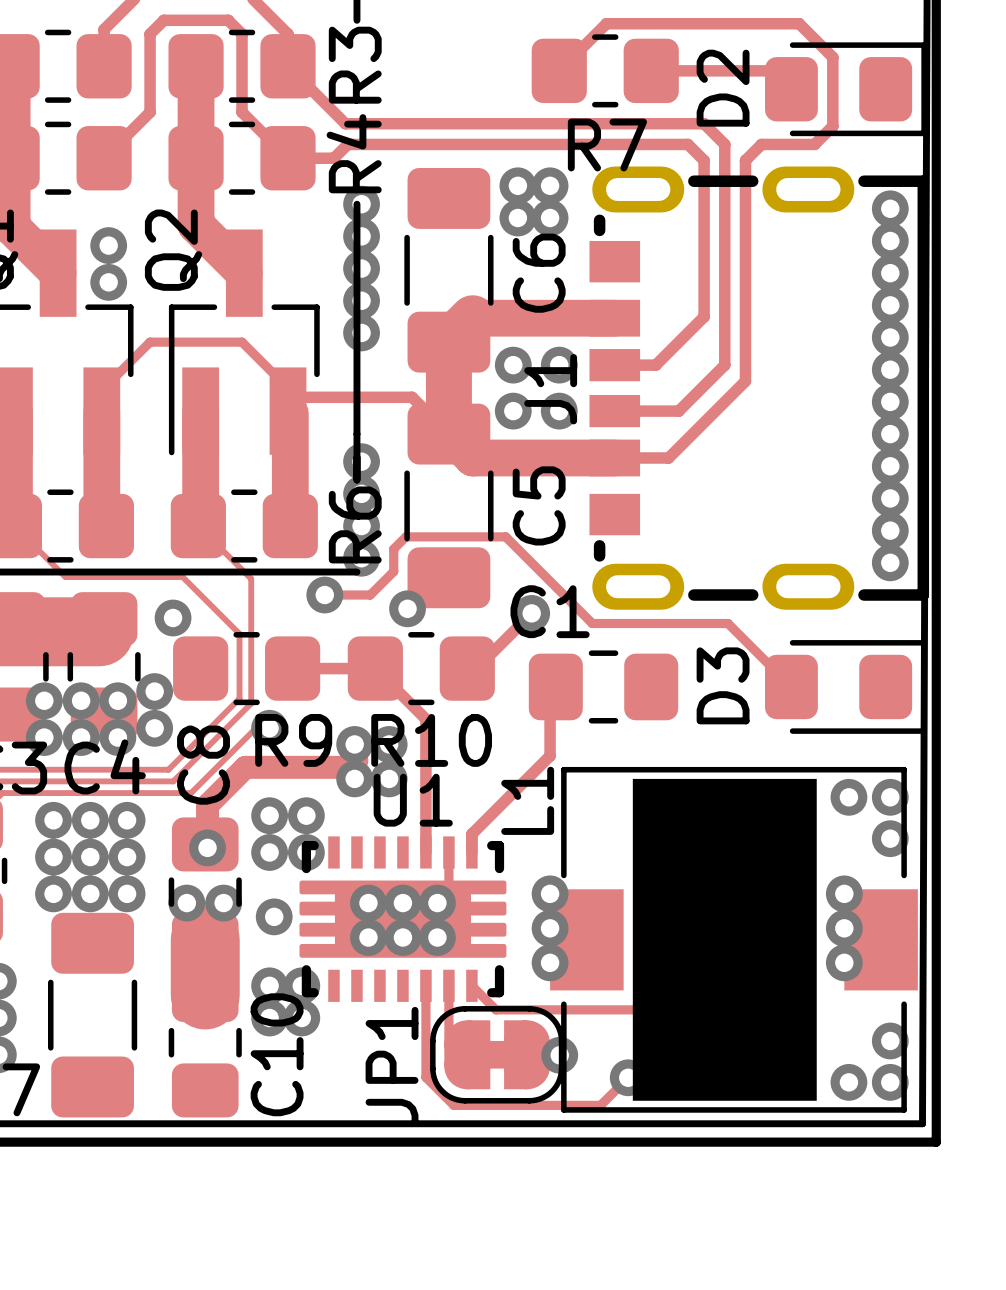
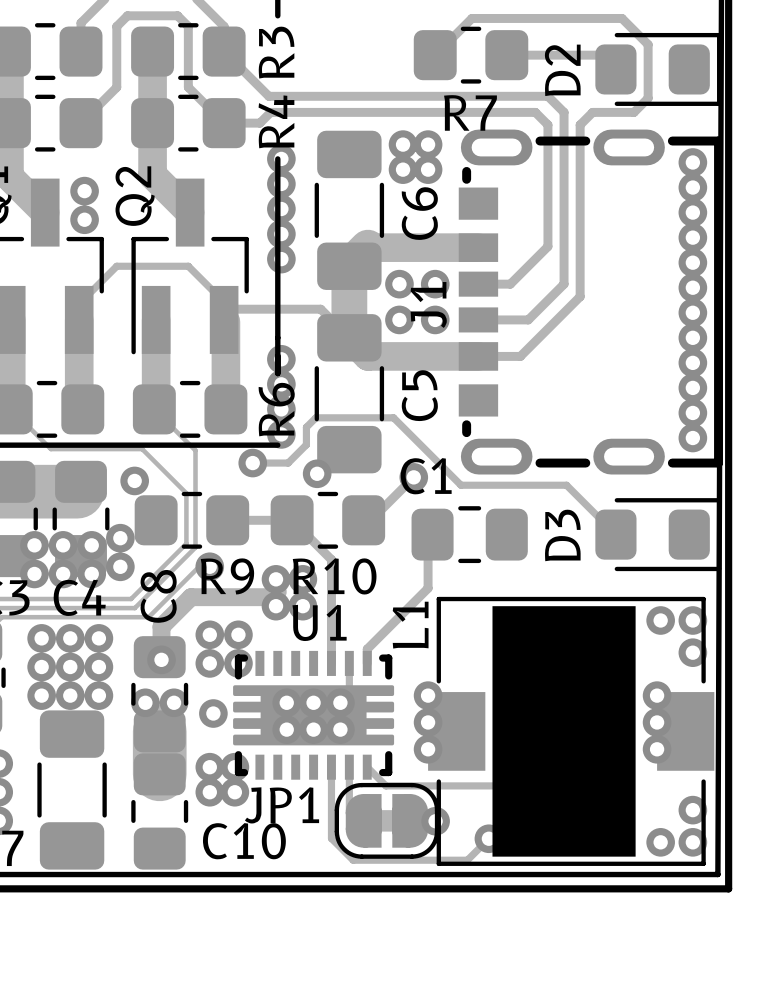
C10 name rotation: 0° (277, 1054) -> 90° clockwise (244, 841)
JP1 name rotation: 0° (392, 1065) -> 90° clockwise (282, 805)

